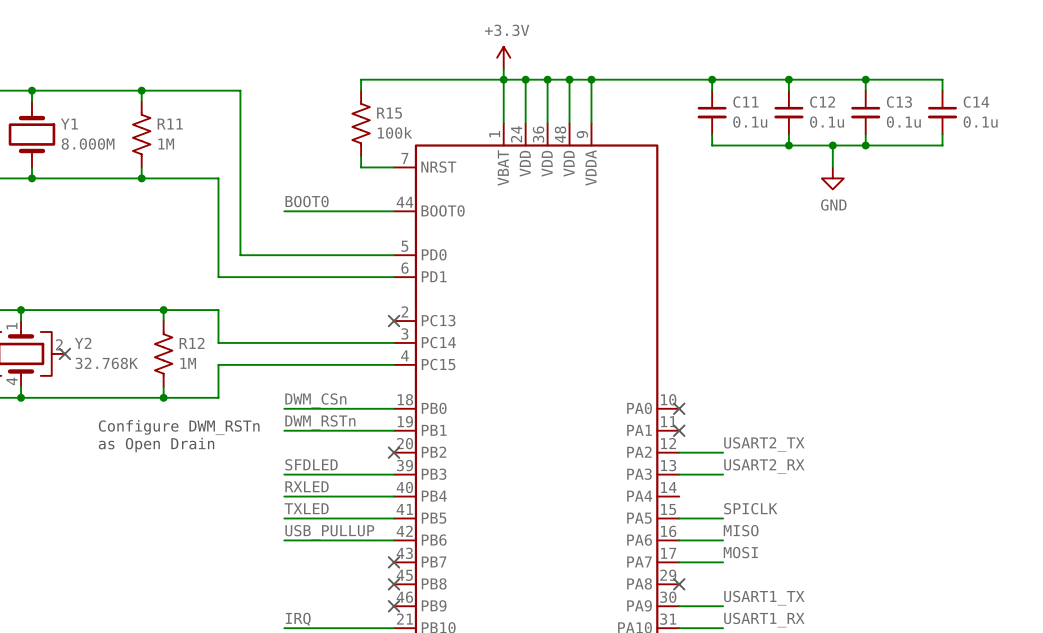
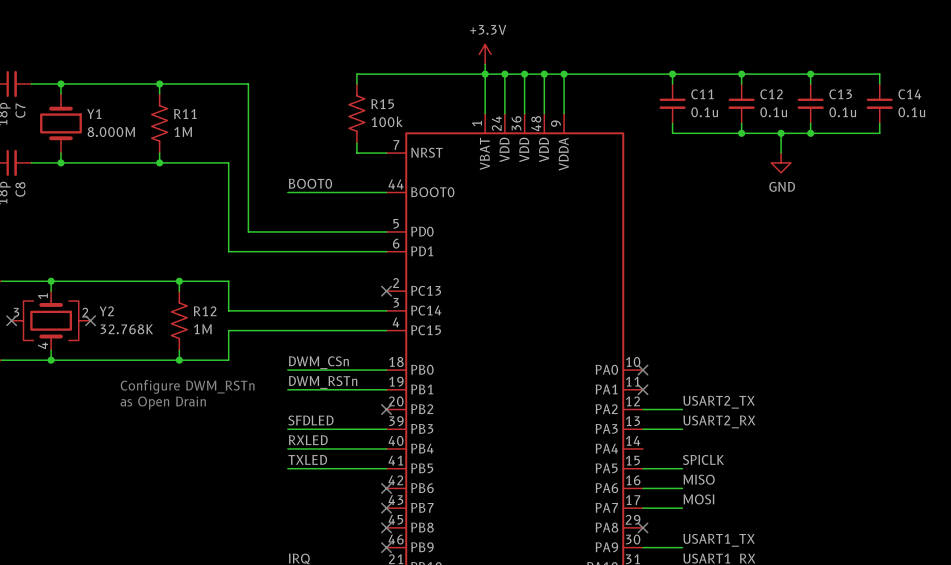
label: USB_PULLUP (329, 532) -> none
wire: (284, 540) (394, 540) -> none
no-connect mark: none -> (386, 488)

